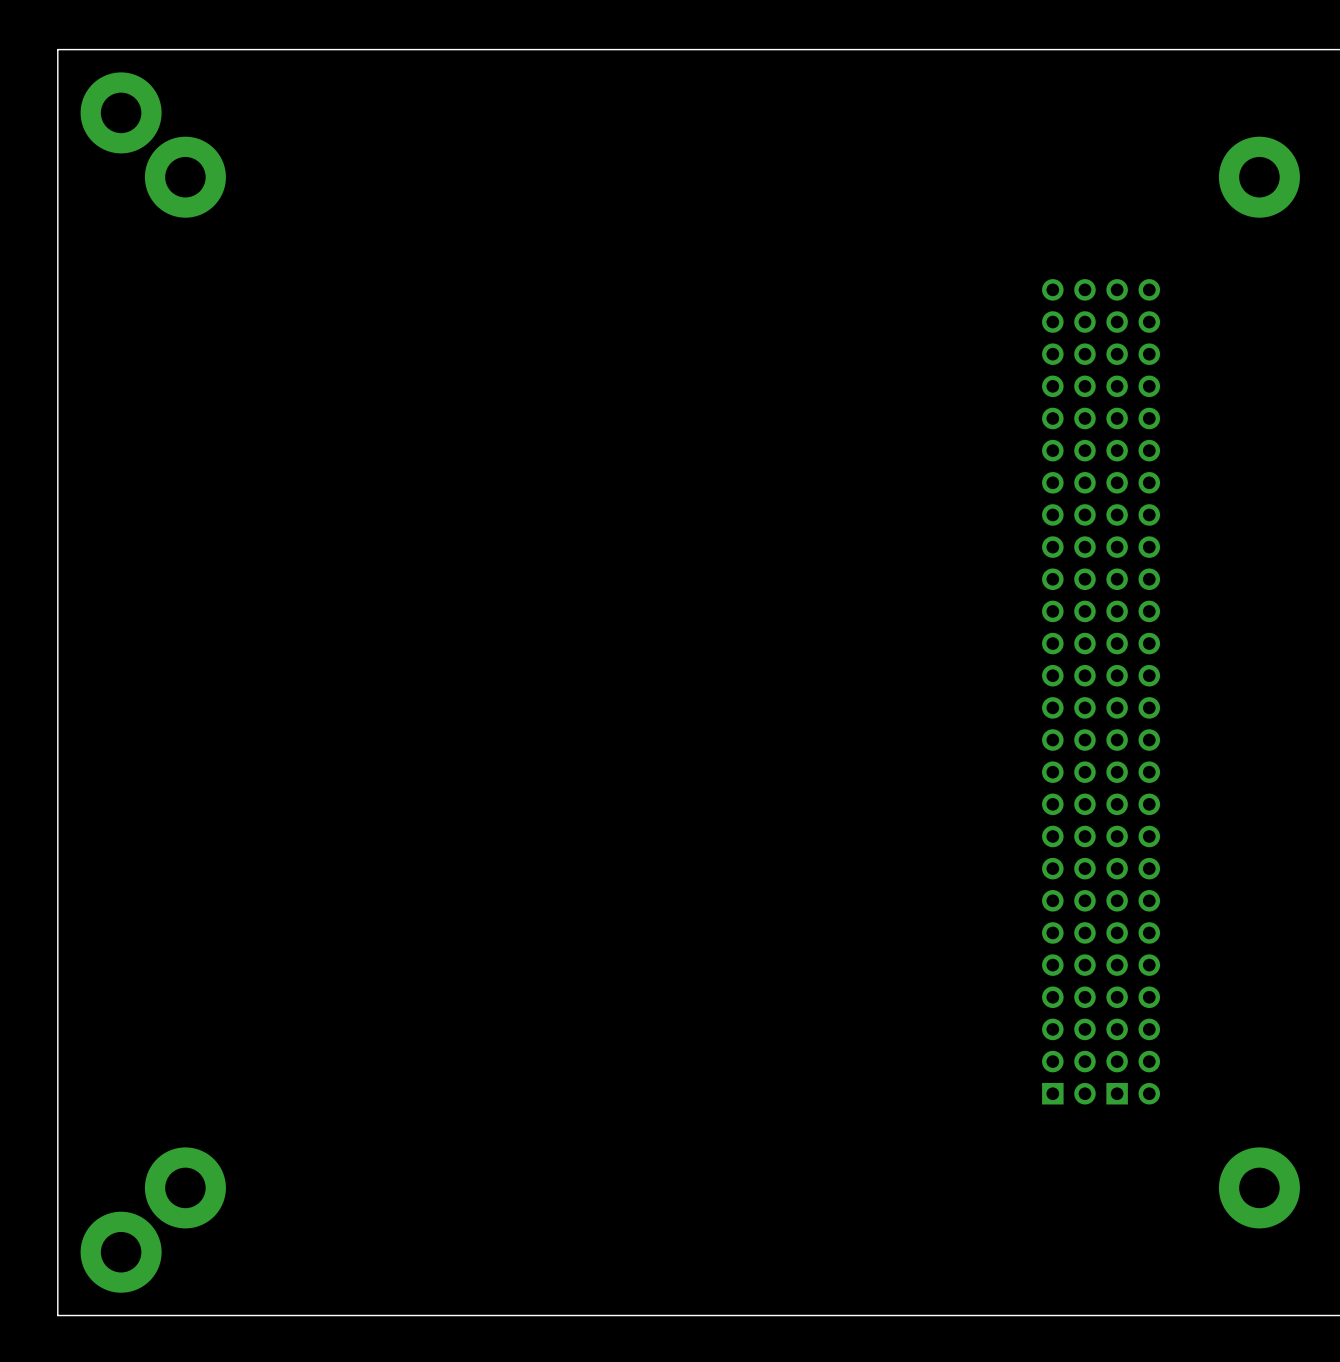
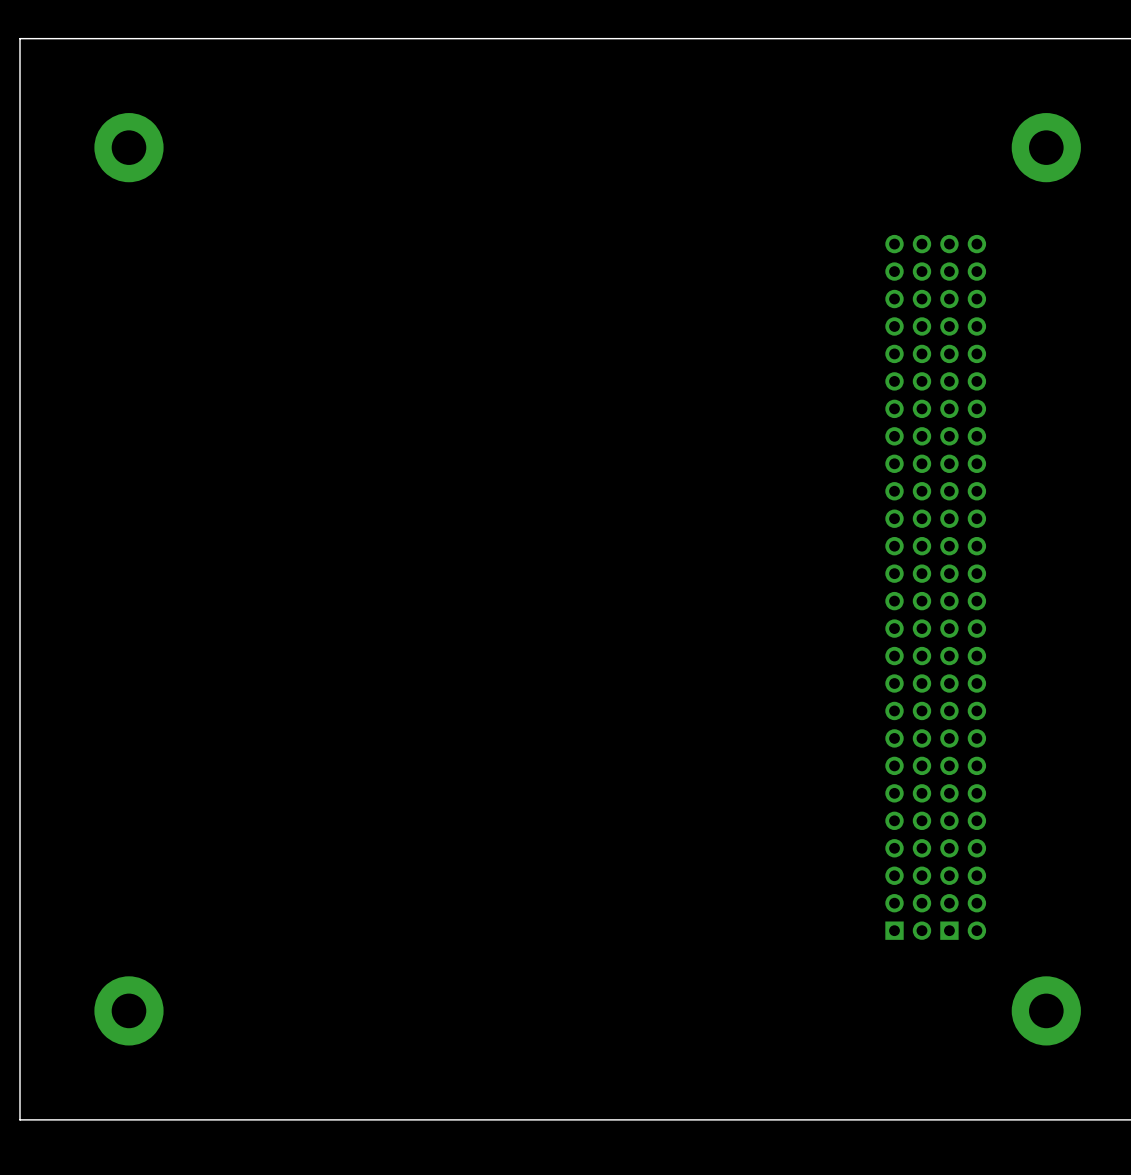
part: (121, 112) -> none
part: (1068, 691) -> none
part: (1133, 691) -> none
part: none -> (908, 587)
part: none -> (963, 587)
part: (121, 1252) -> none

